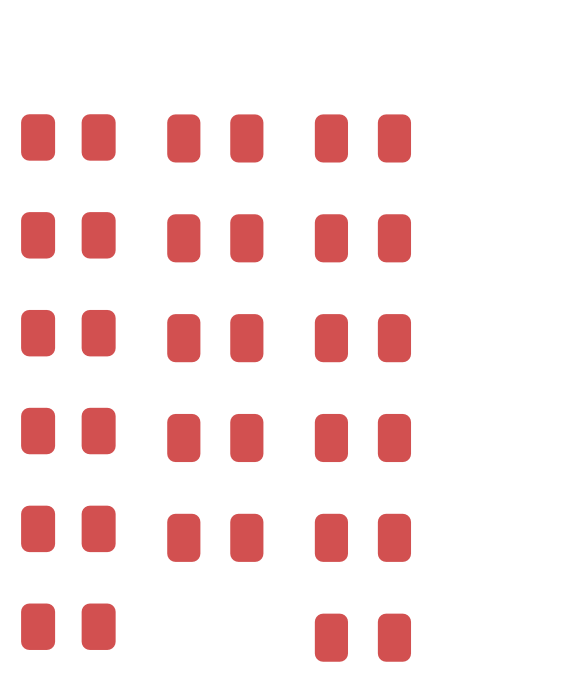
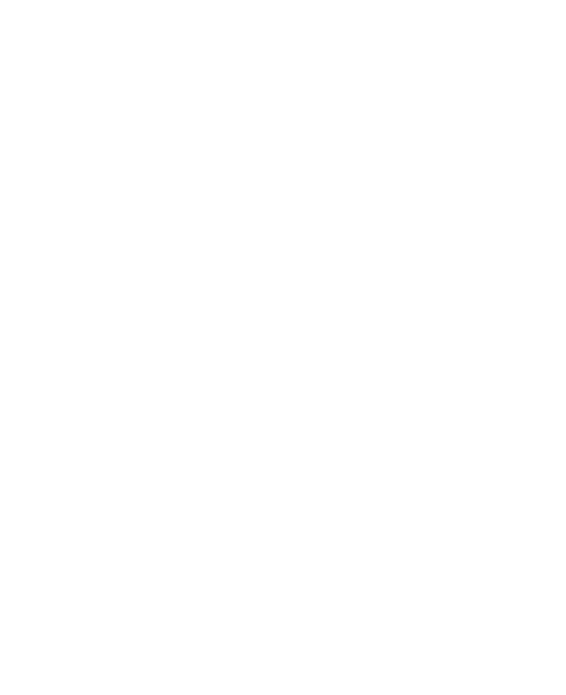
part: (68, 137) -> none
part: (215, 138) -> none
part: (362, 138) -> none
part: (68, 235) -> none
part: (215, 238) -> none
part: (362, 238) -> none
part: (68, 333) -> none
part: (215, 338) -> none
part: (362, 338) -> none
part: (68, 431) -> none
part: (215, 438) -> none
part: (362, 438) -> none
part: (68, 528) -> none
part: (215, 537) -> none
part: (362, 537) -> none
part: (68, 626) -> none
part: (362, 637) -> none

